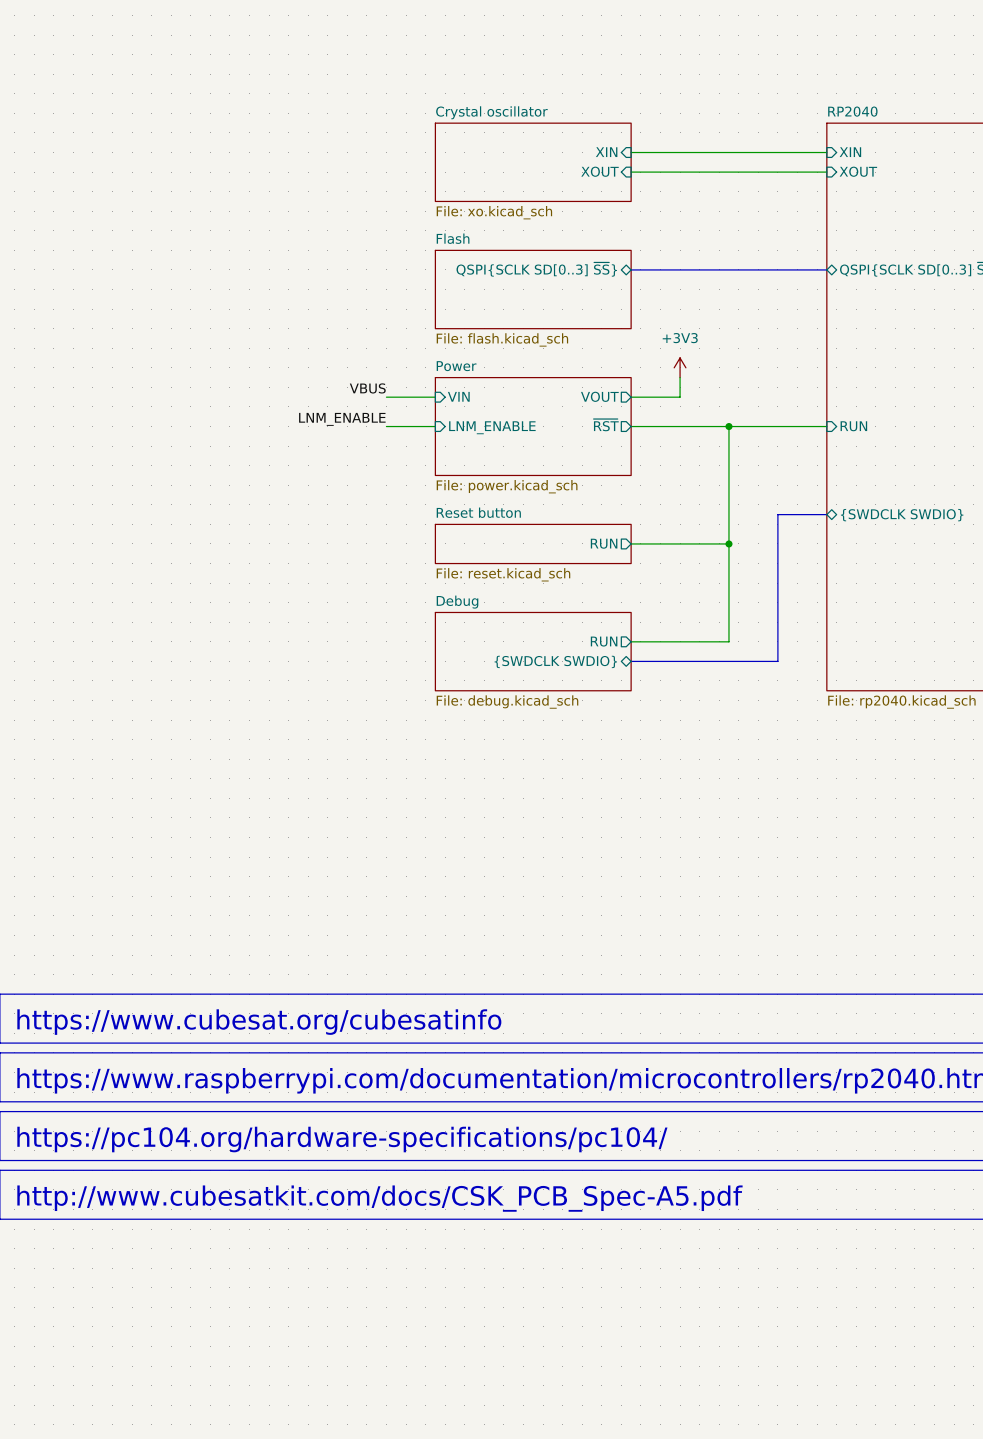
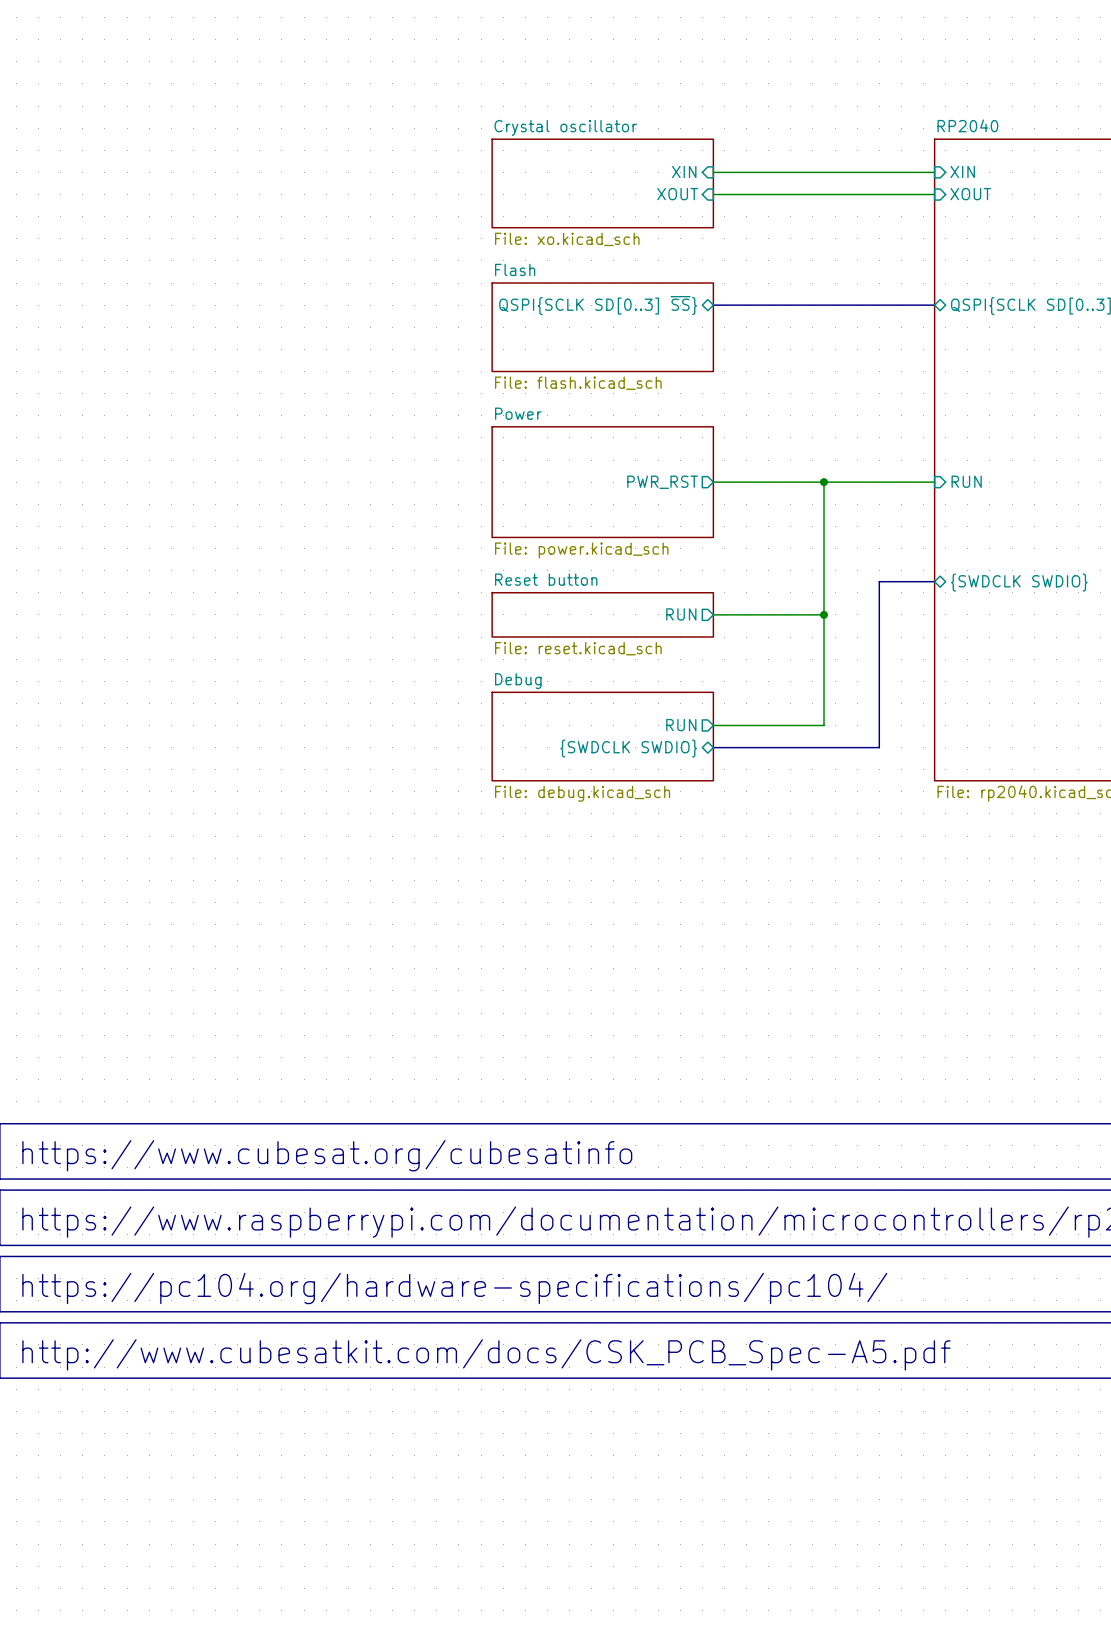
power symbol: +3V3 (680, 367) -> none
wire: (680, 377) (680, 397) (631, 397) -> none
label: VBUS (367, 388) -> none
sheet pin: VIN (458, 396) -> none
sheet pin: VOUT (599, 396) -> none
wire: (386, 397) (435, 397) -> none
label: LNM_ENABLE (342, 419) -> none
sheet pin: ~{RST} (606, 425) -> PWR_RST (662, 482)
wire: (386, 426) (435, 426) -> none
sheet pin: LNM_ENABLE (492, 427) -> none

